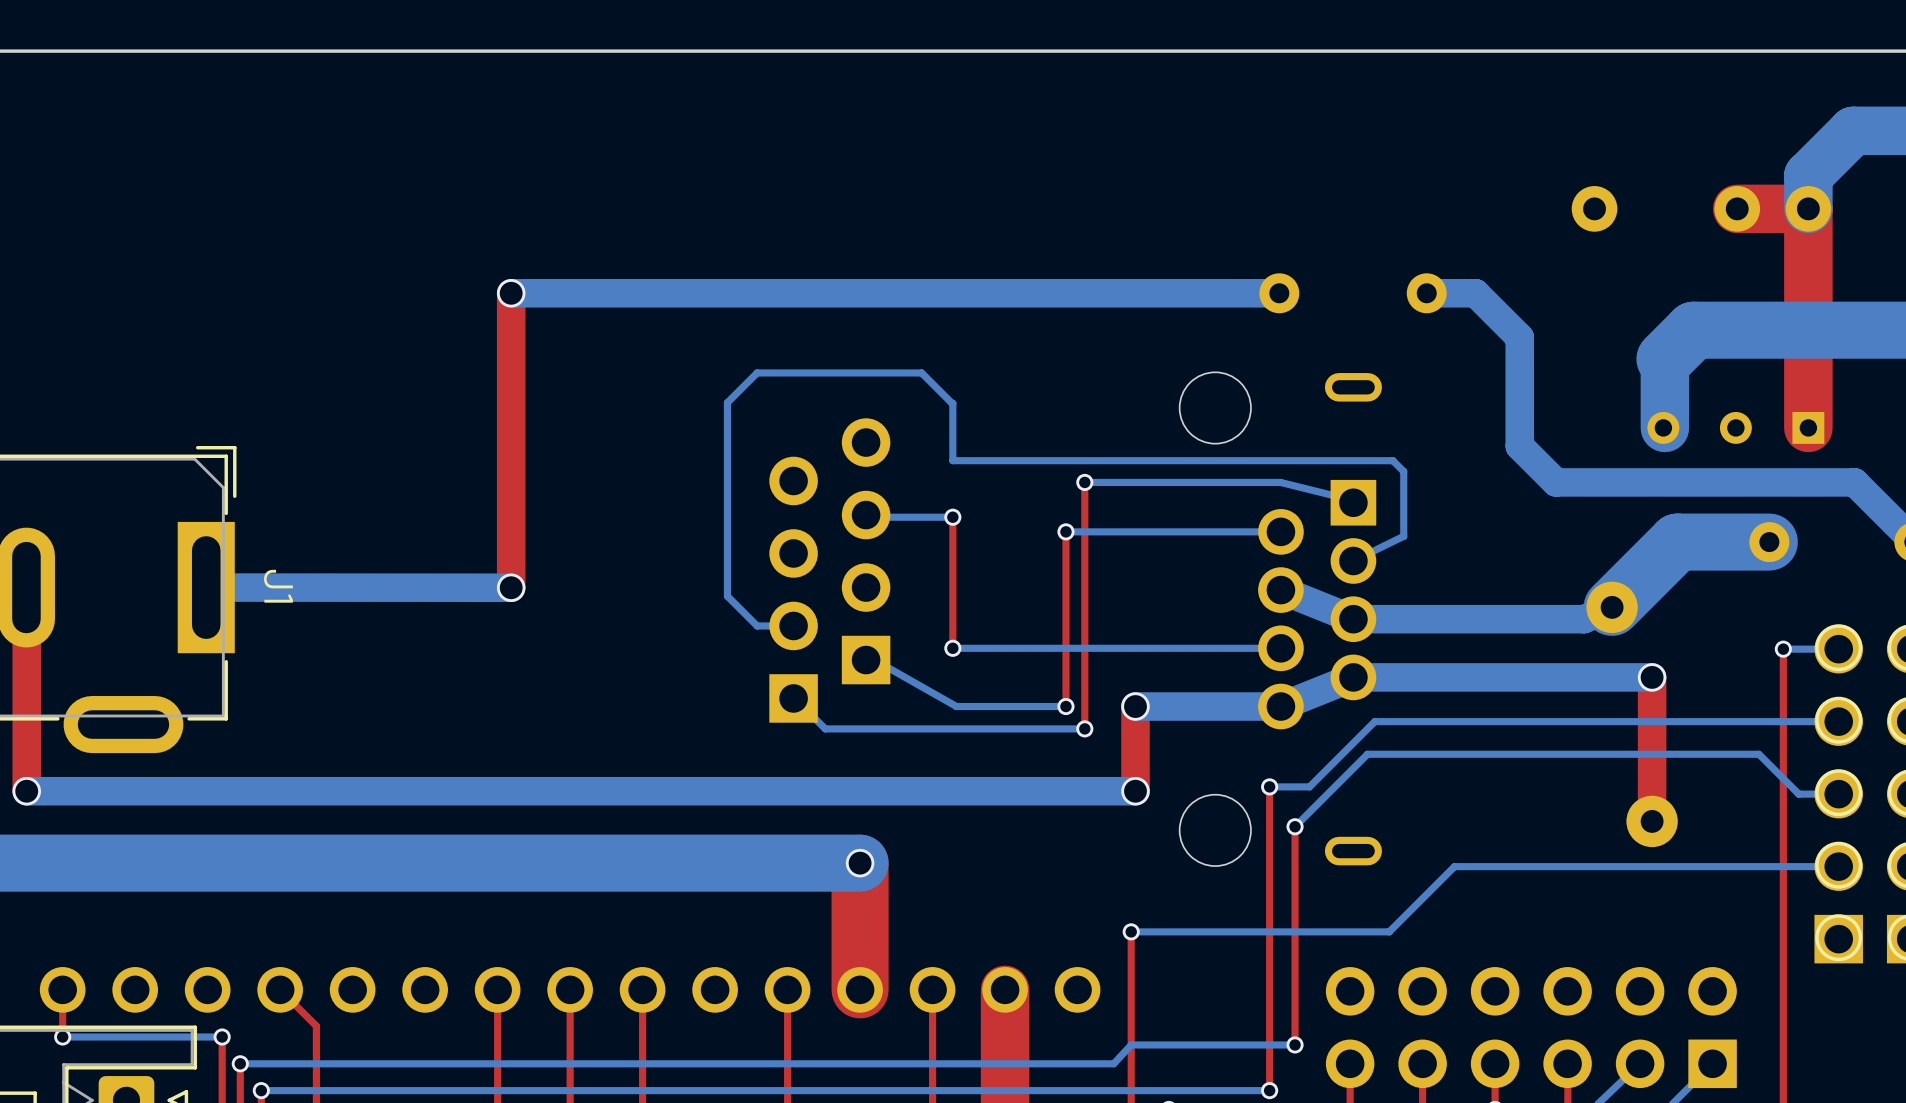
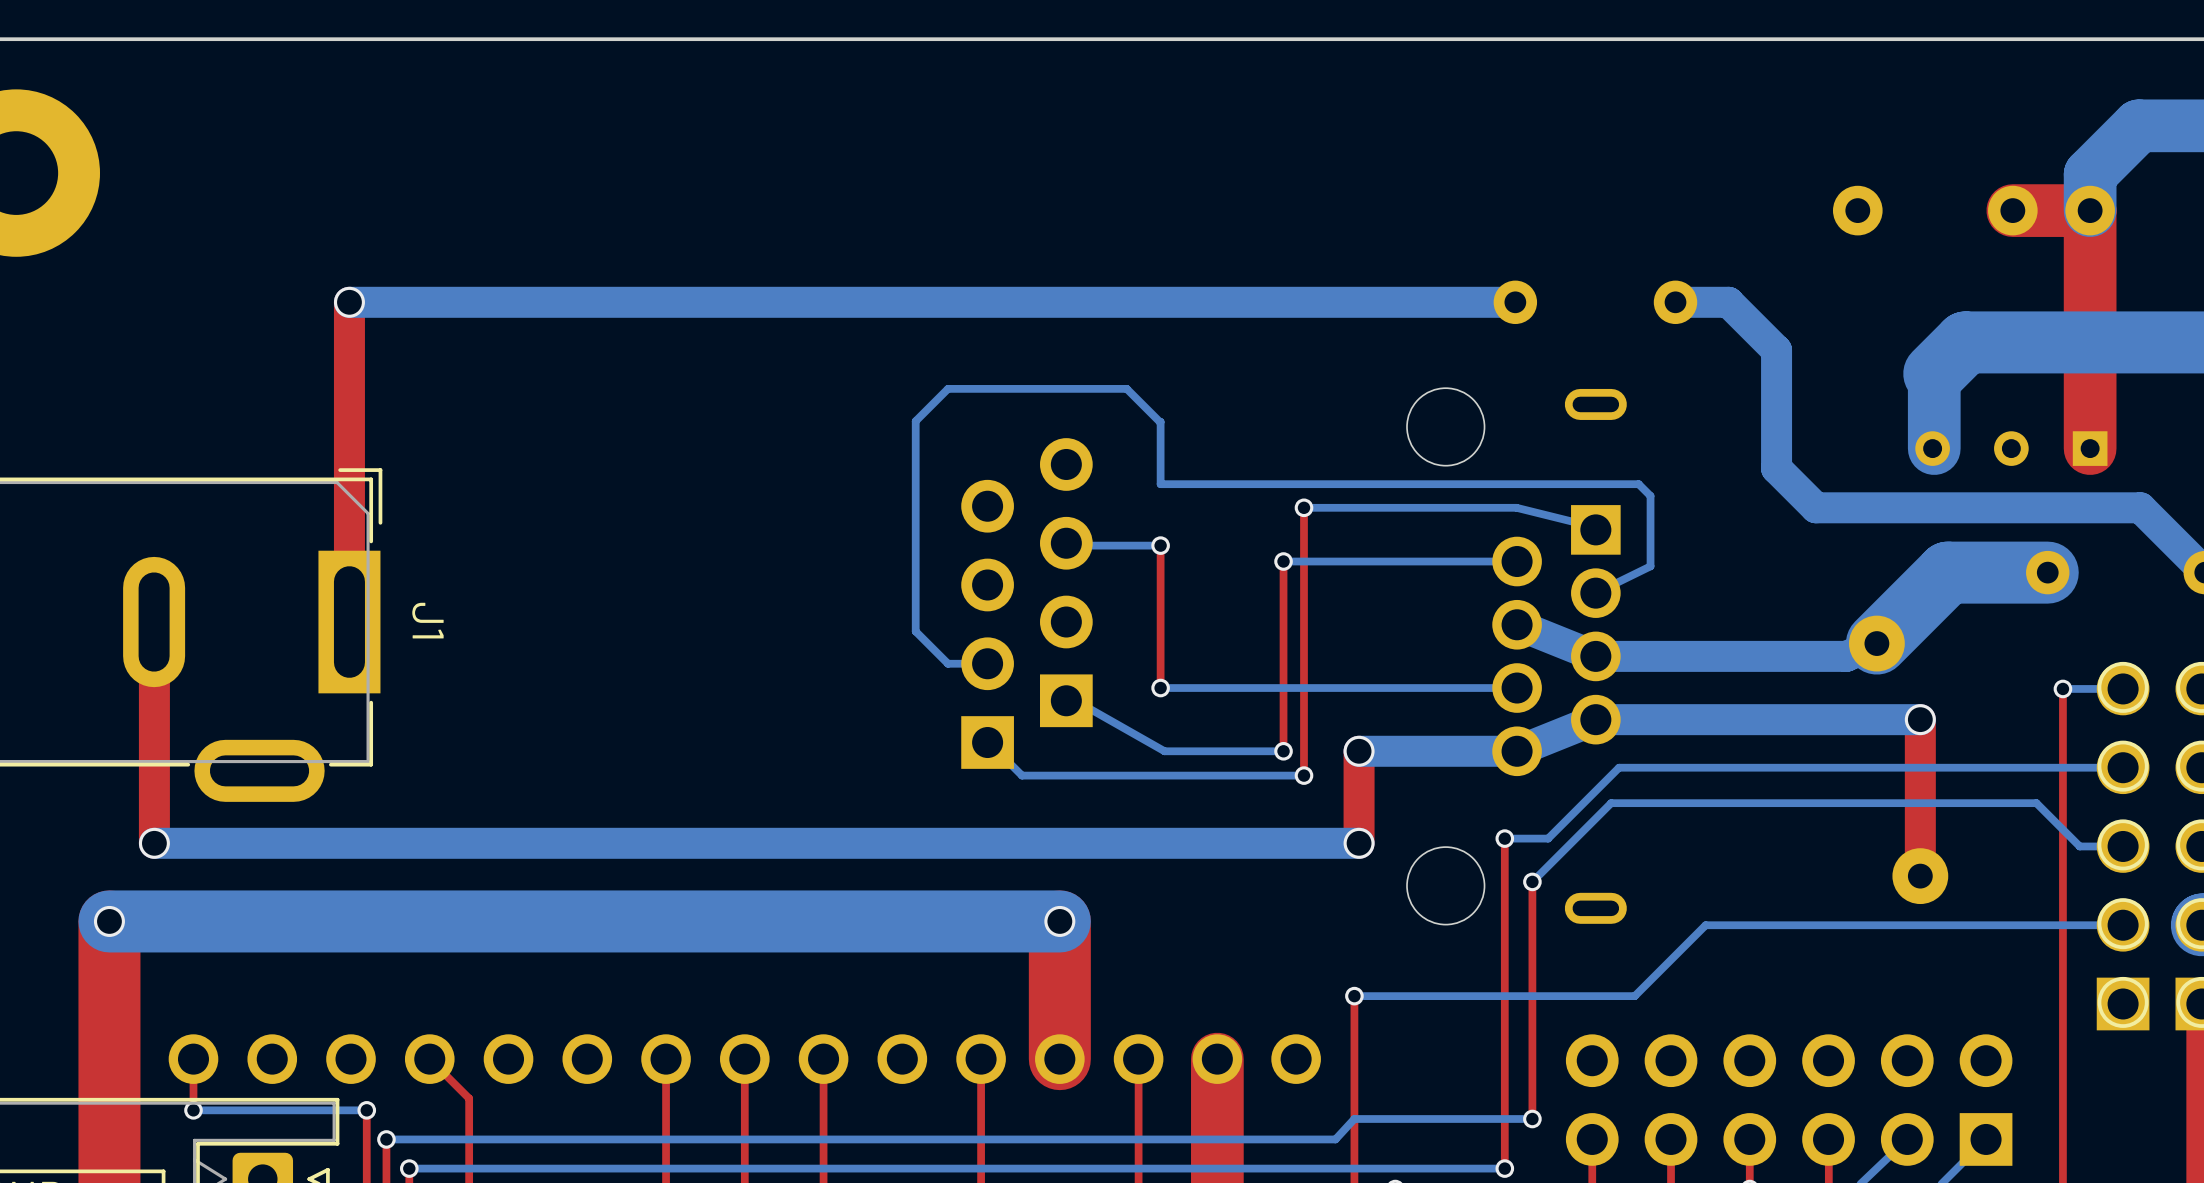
via: none -> (349, 302)
top track: (511, 293) (511, 587) -> (349, 302) (349, 622)
via: (511, 293) -> none
bottom track: none -> (682, 302) (349, 302)
bottom track: (206, 587) (511, 587) -> none
via: (511, 587) -> none

